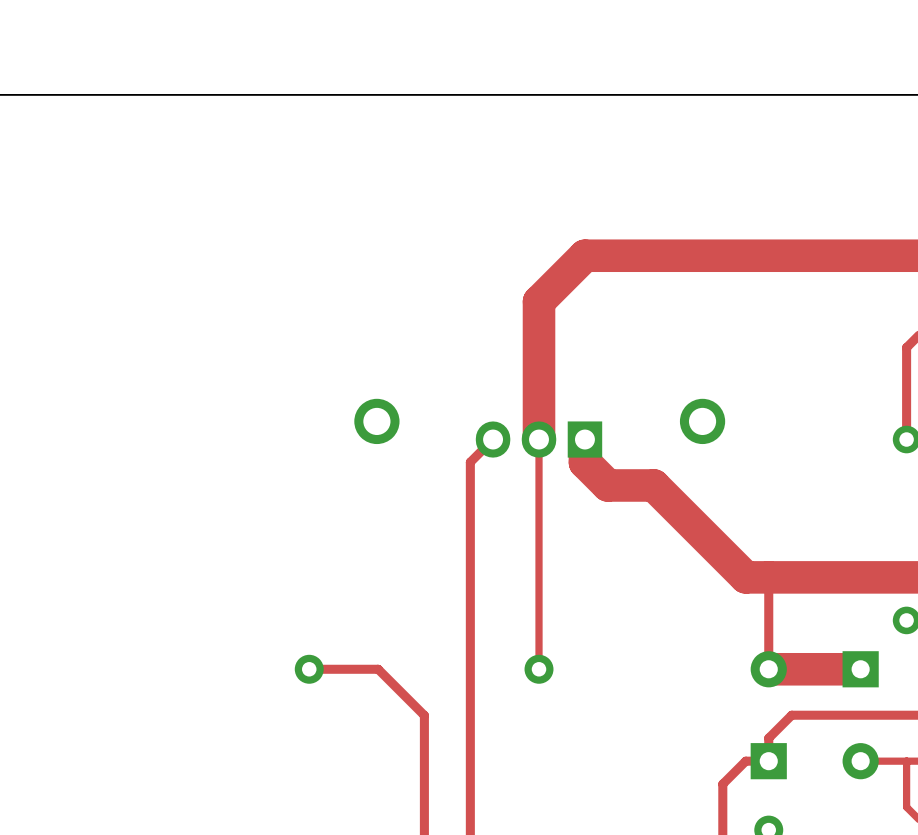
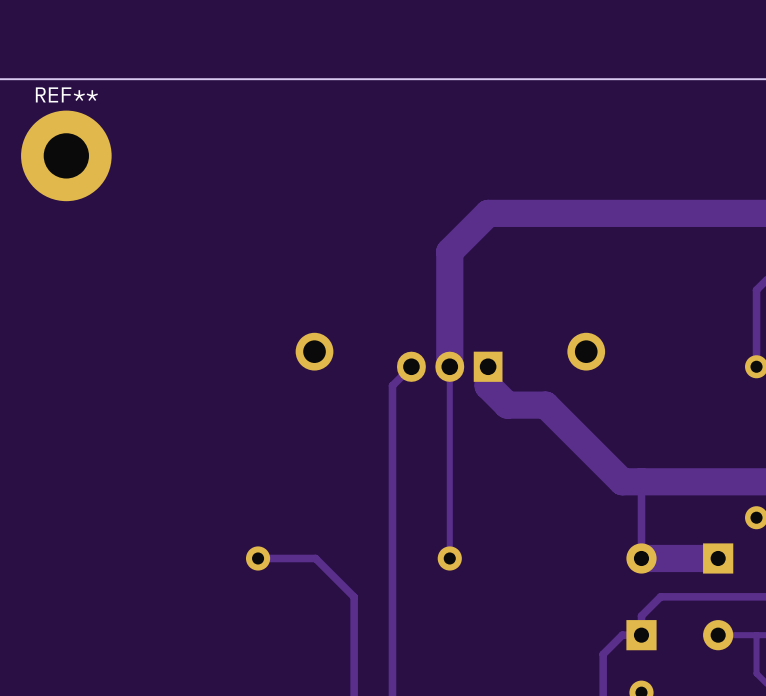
REF**: none -> (66, 155)

